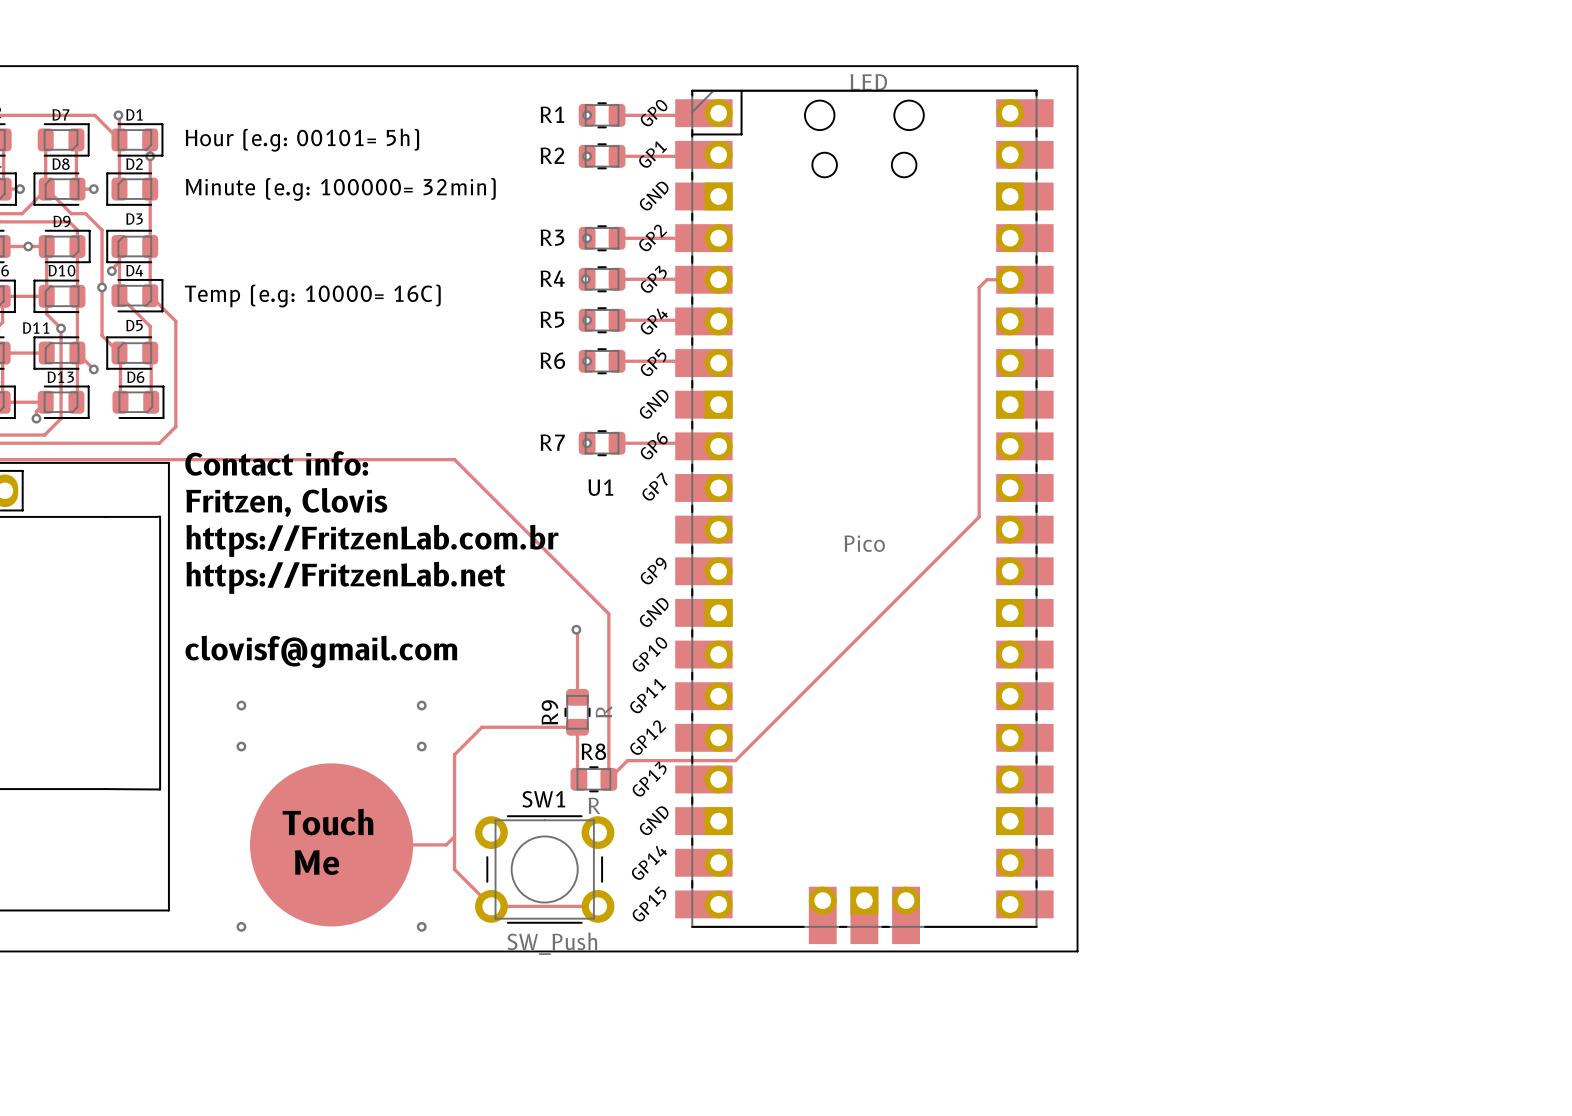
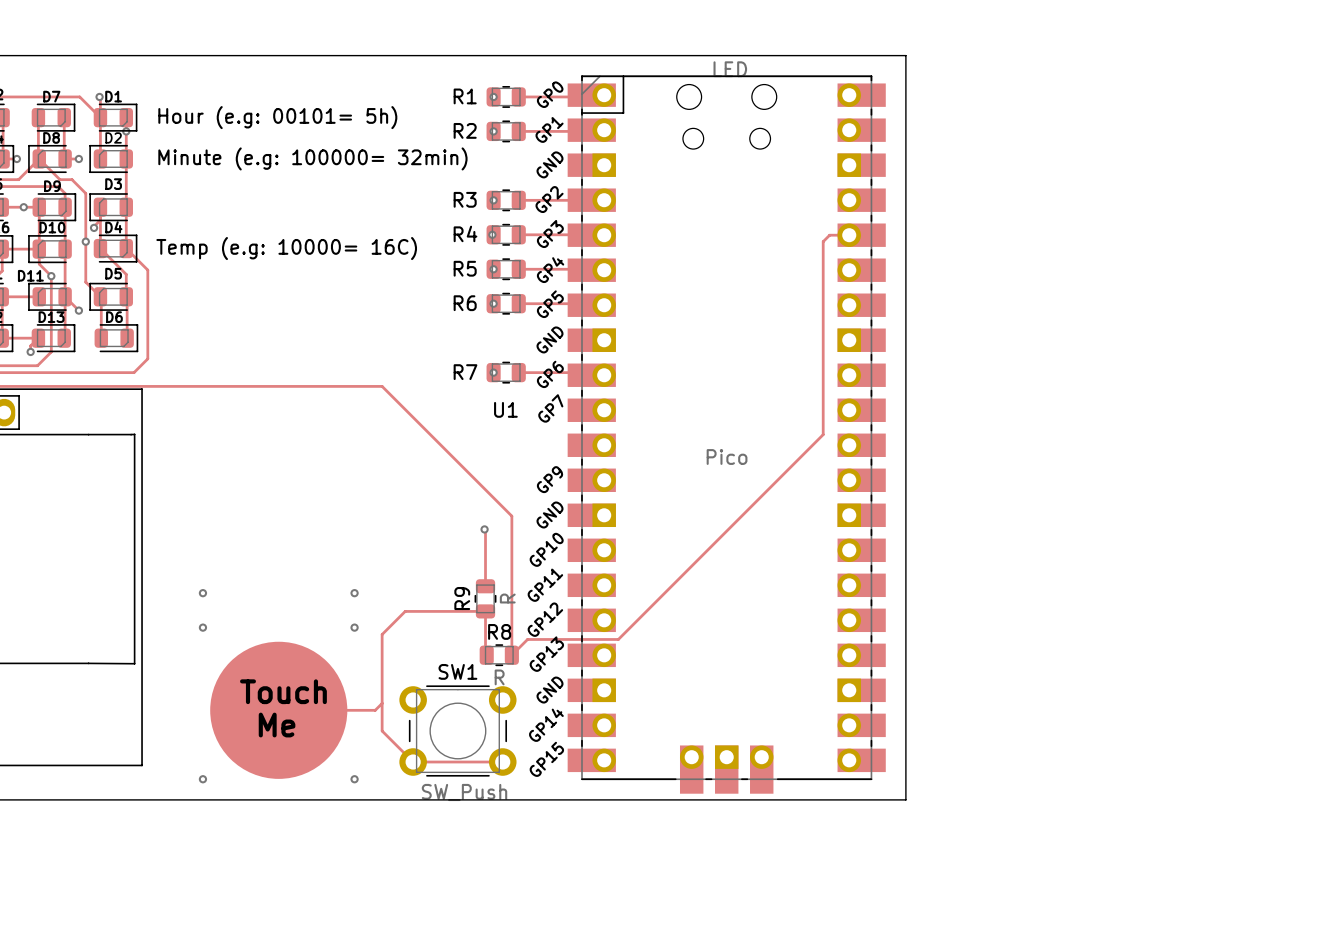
text: Contact info: (276, 463) -> none
text: Fritzen, Clovis (286, 502) -> none
text: https://FritzenLab.com.br (372, 540) -> none
text: https://FritzenLab.net (345, 577) -> none
text: clovisf@gmail.com (321, 651) -> none

